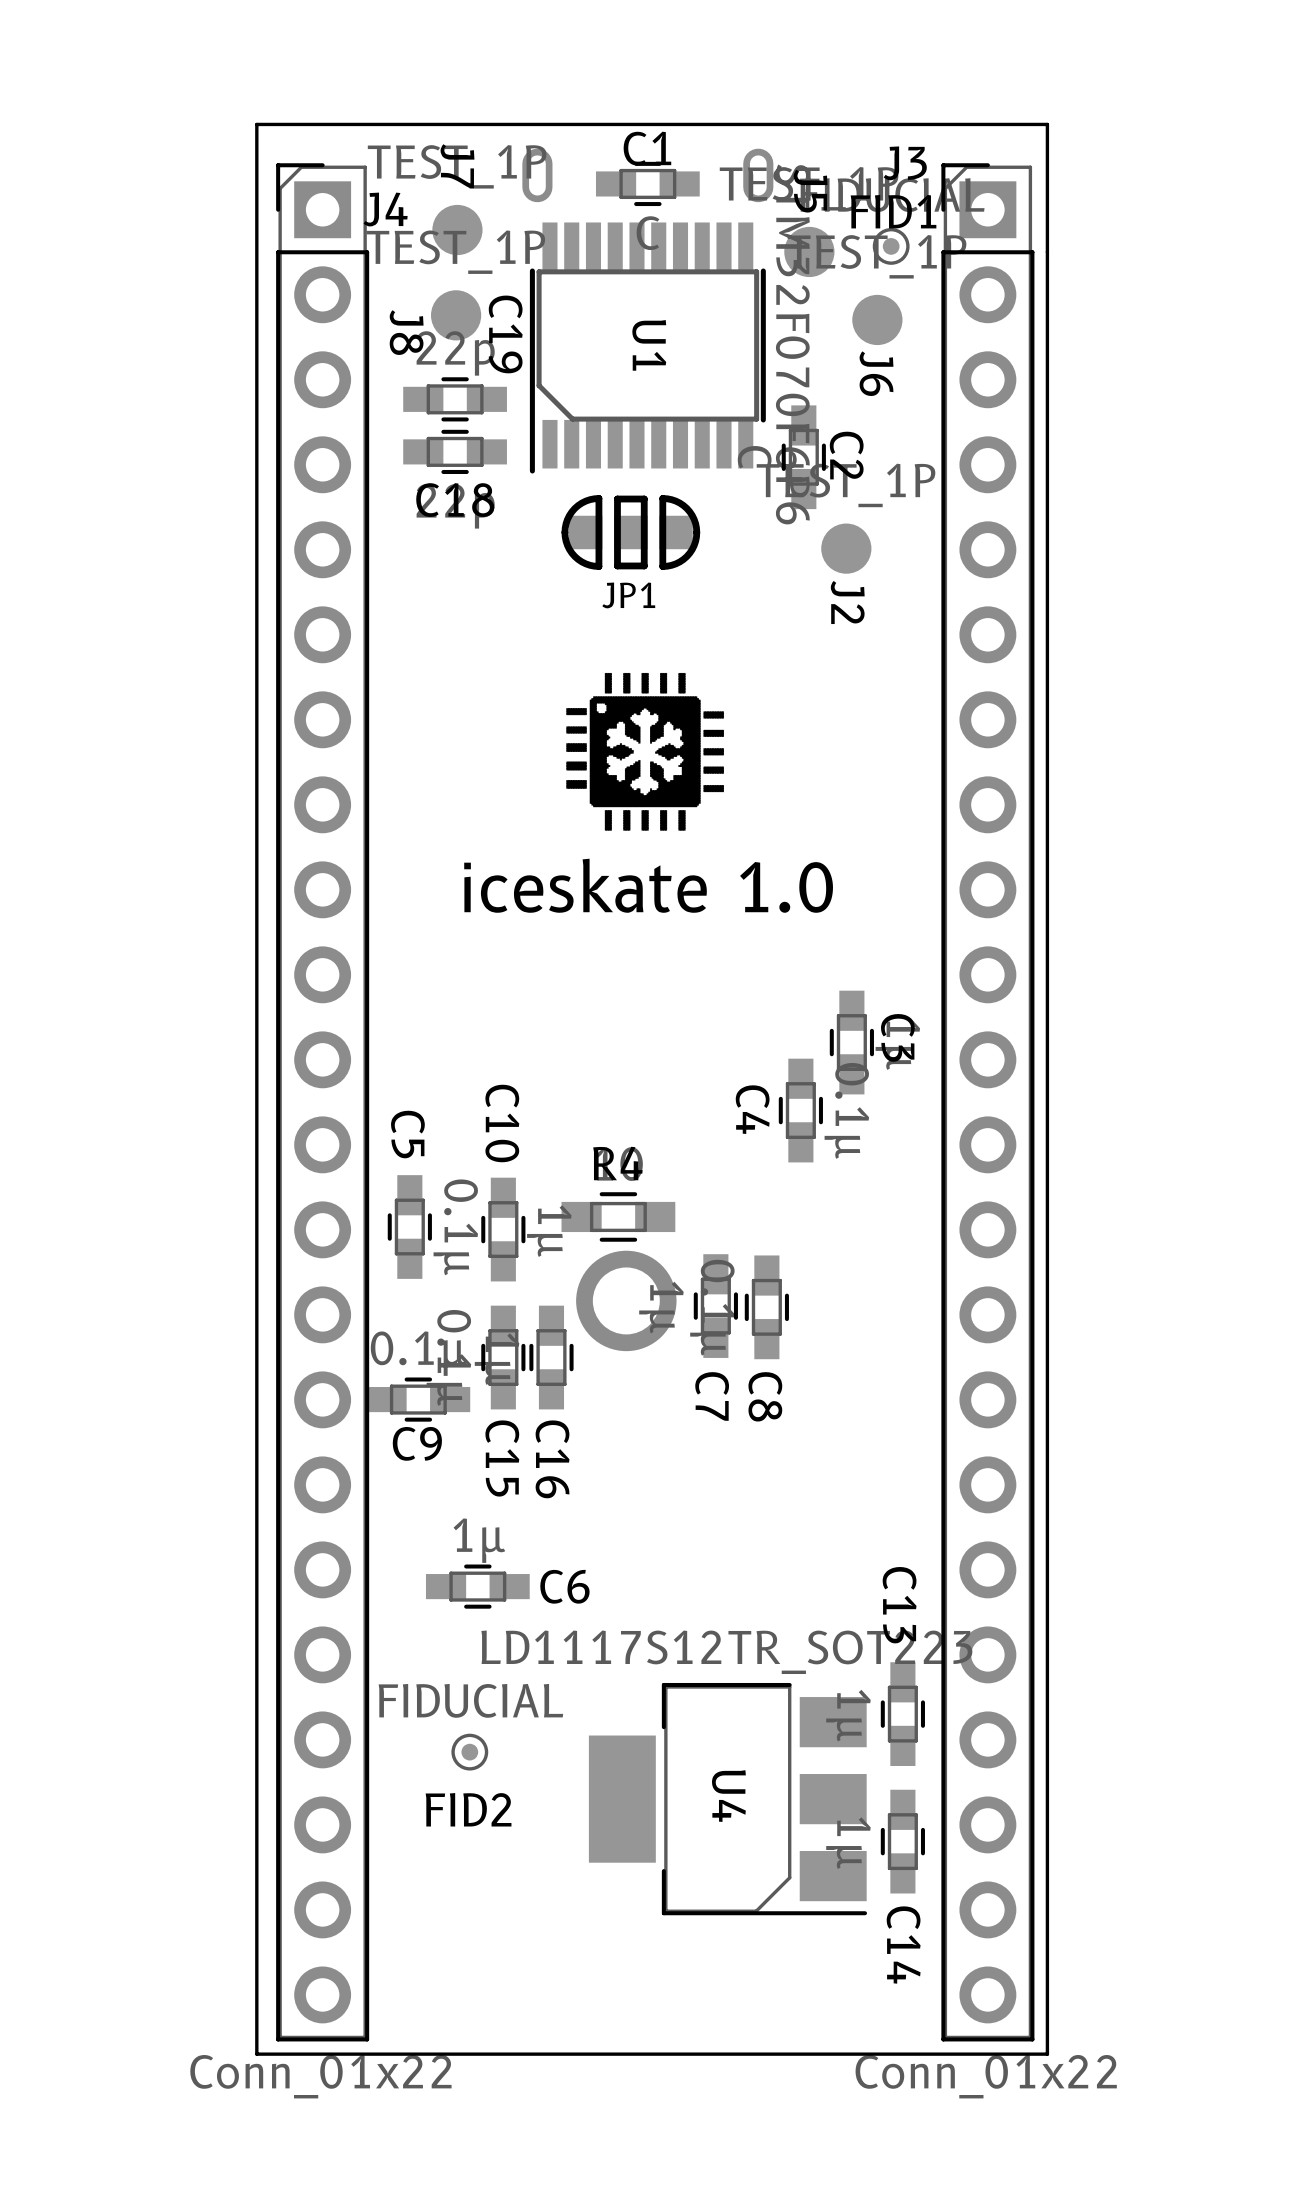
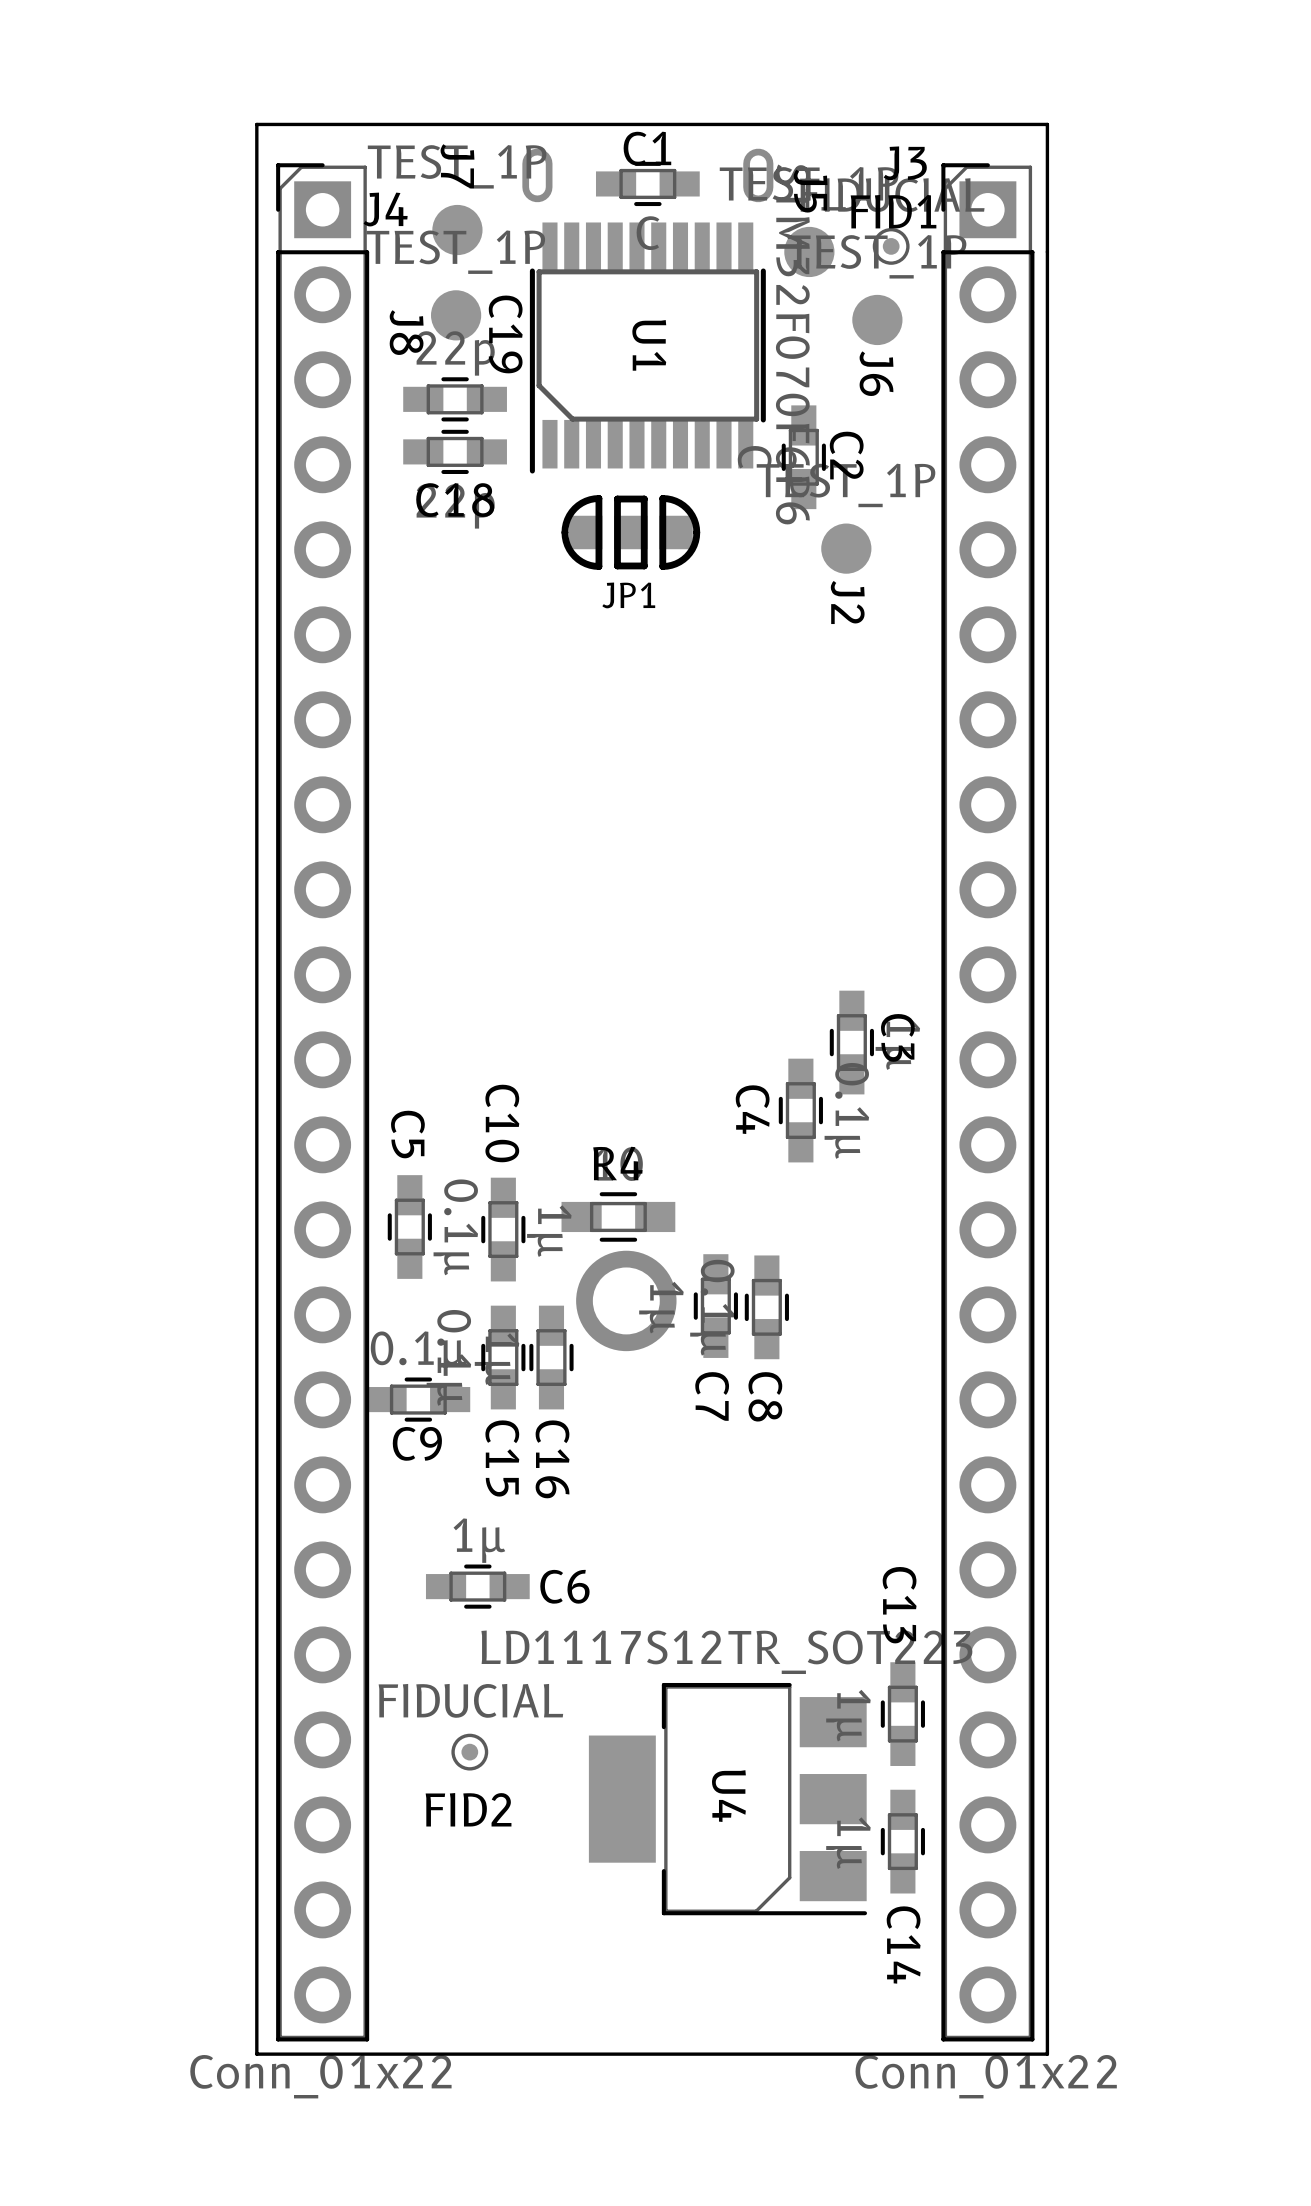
drawing: [566, 672, 725, 831] -> none
text: iceskate 1.0 (648, 885) -> none

